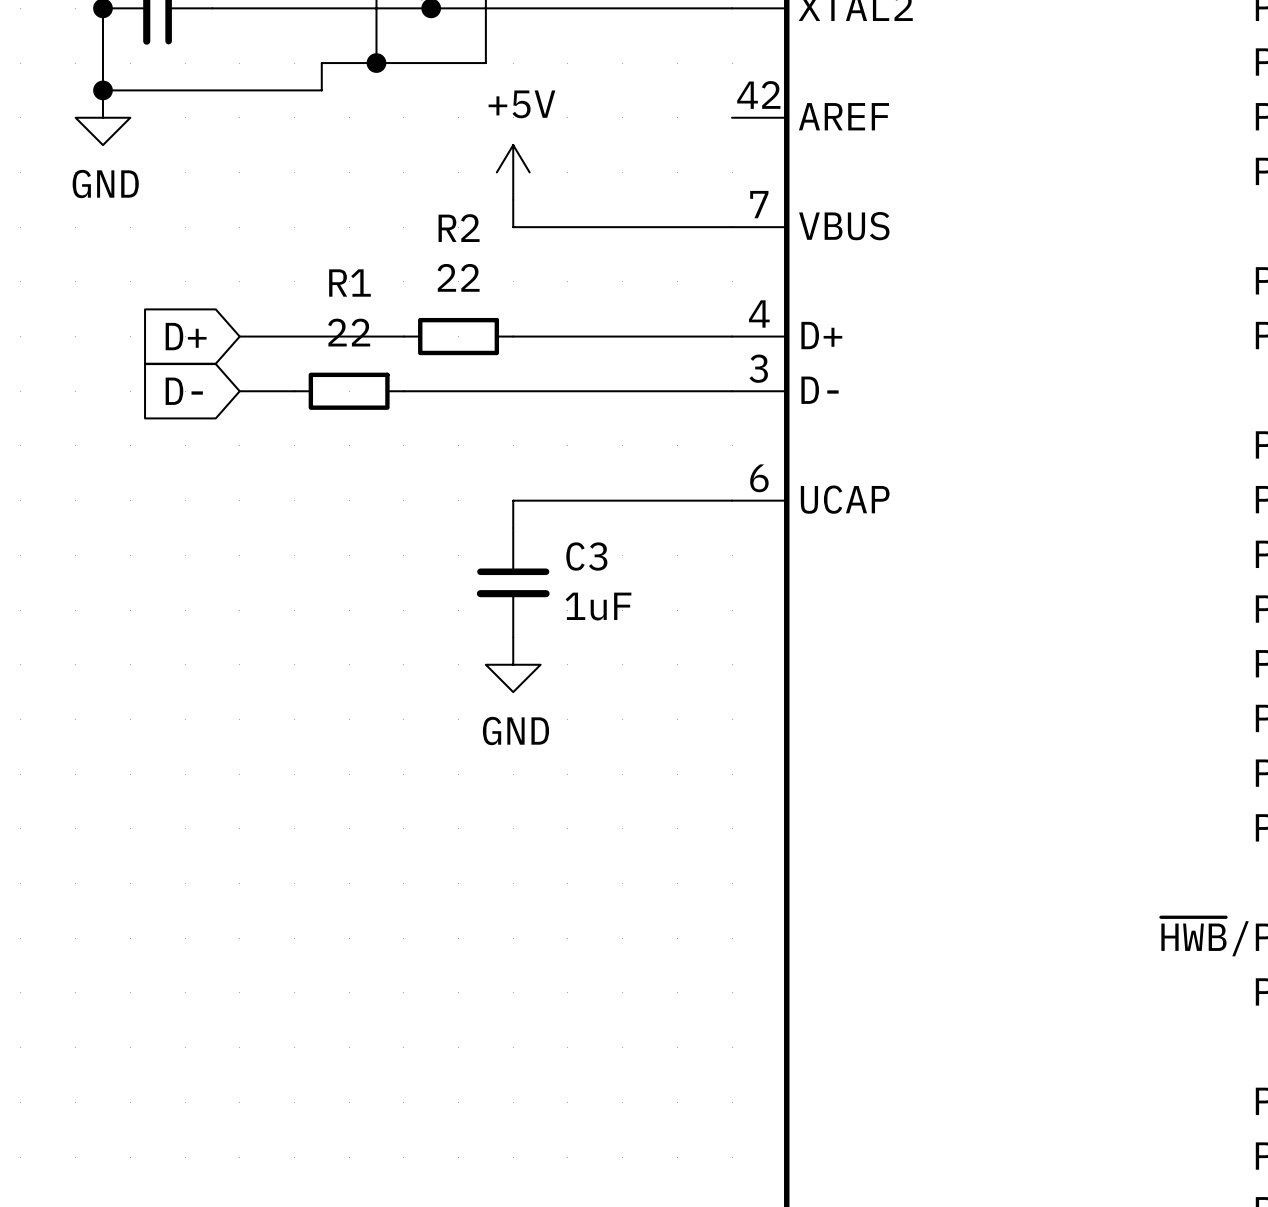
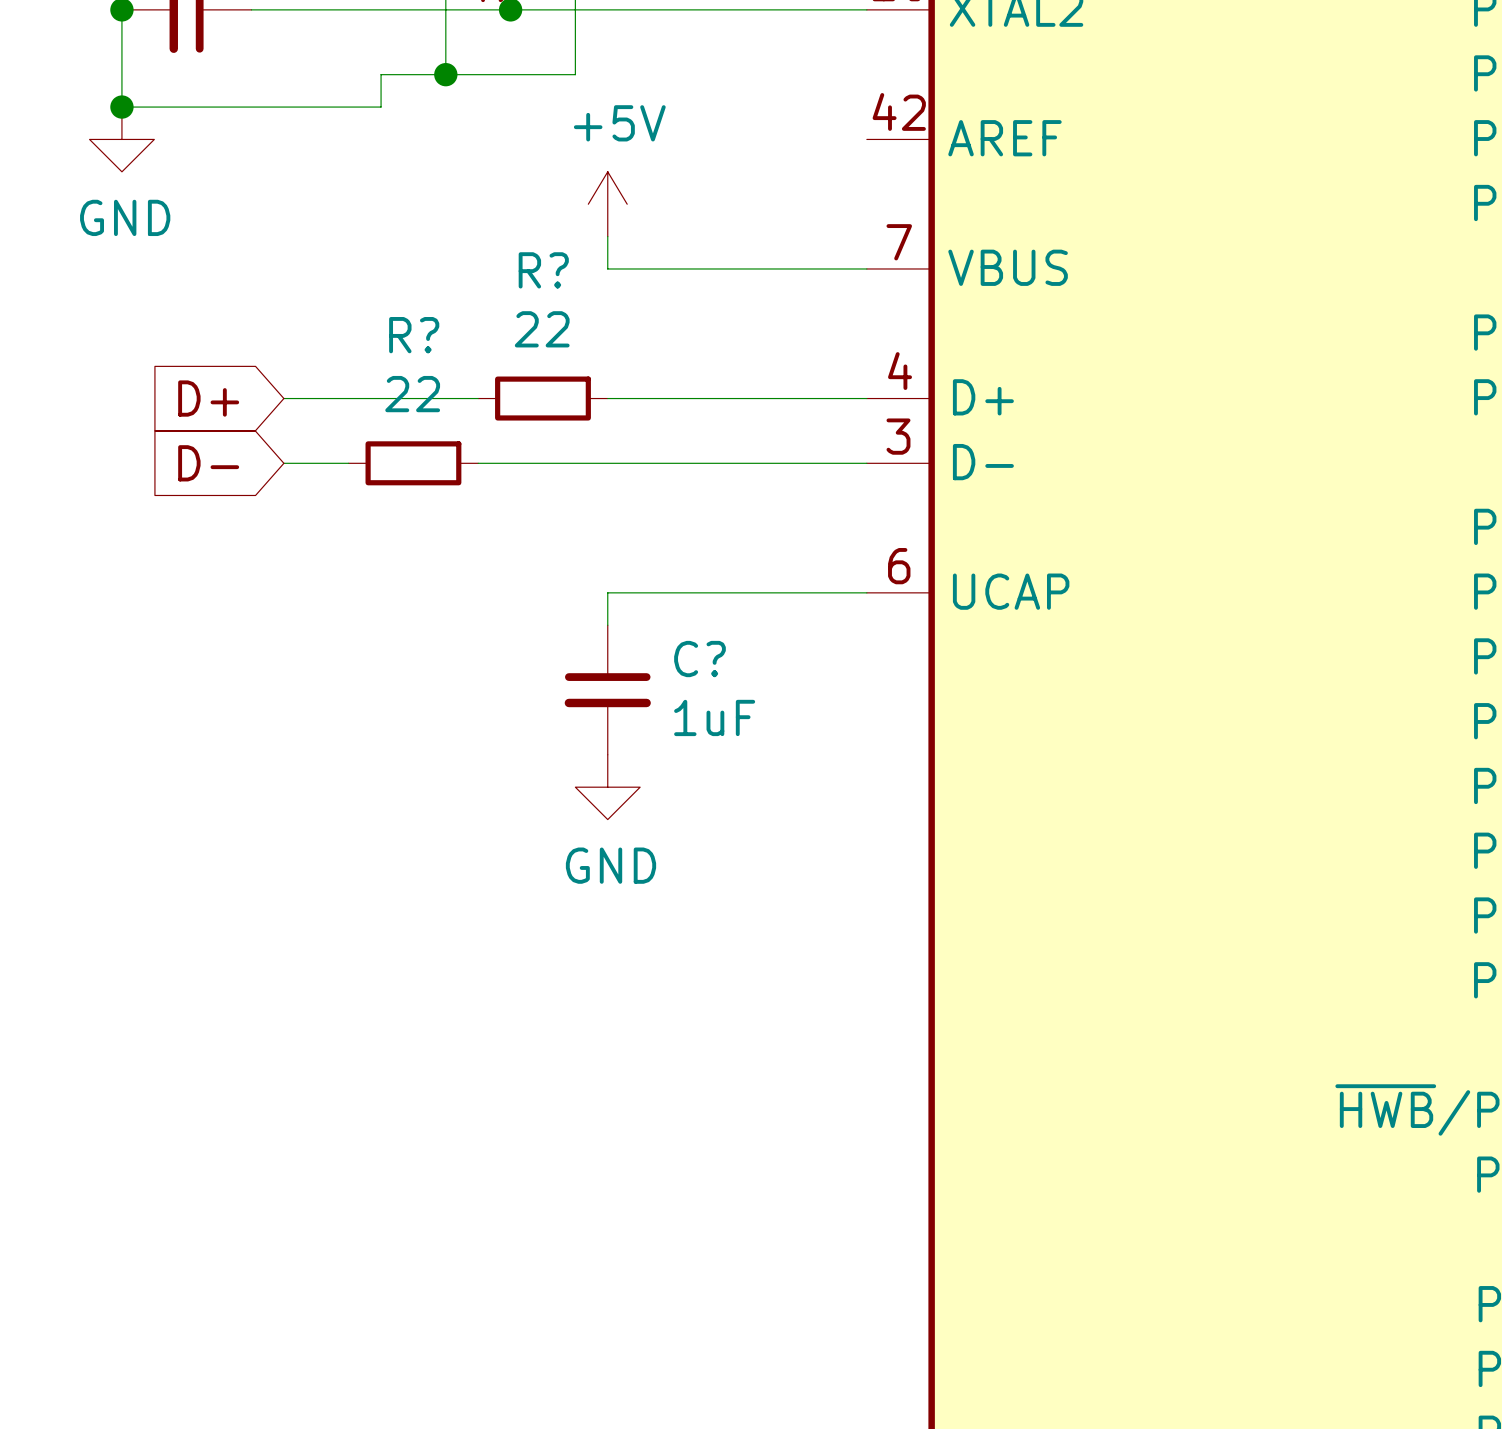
R2 name: R2 (459, 228) -> R? (543, 270)
R1 name: R1 (349, 283) -> R? (414, 335)
C3 name: C3 (586, 556) -> C? (699, 659)

